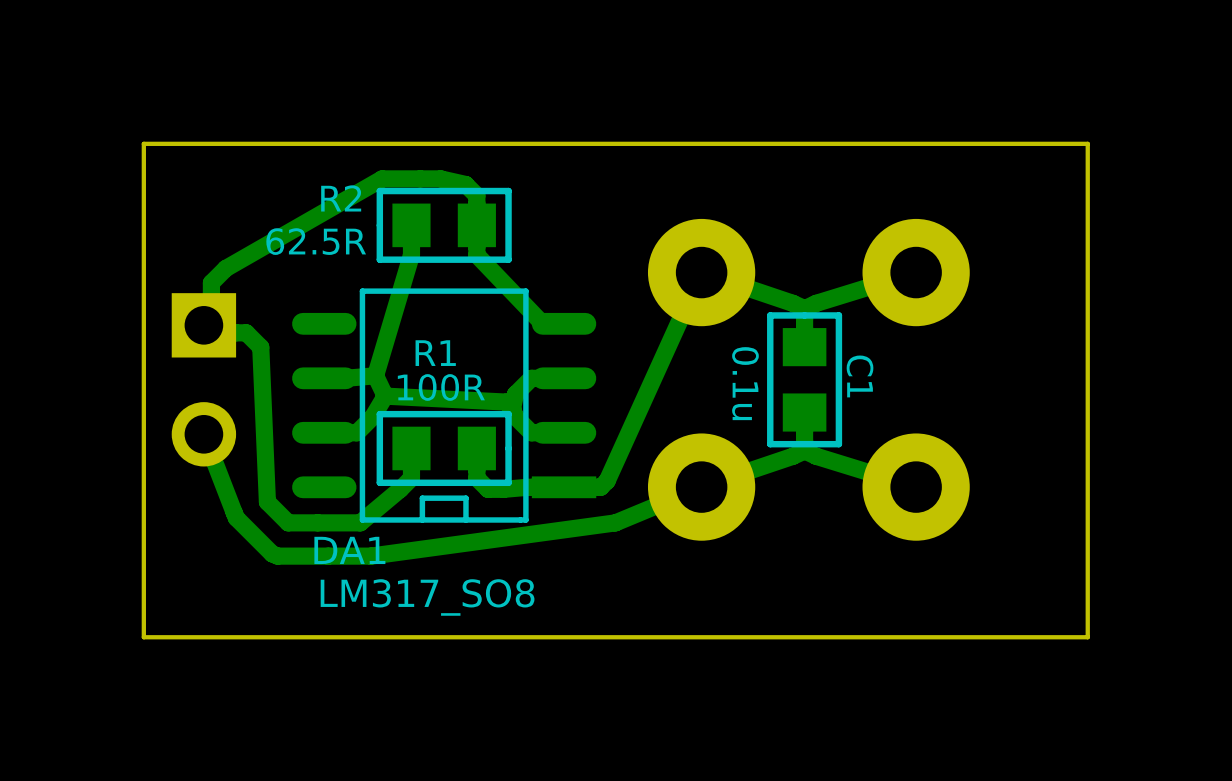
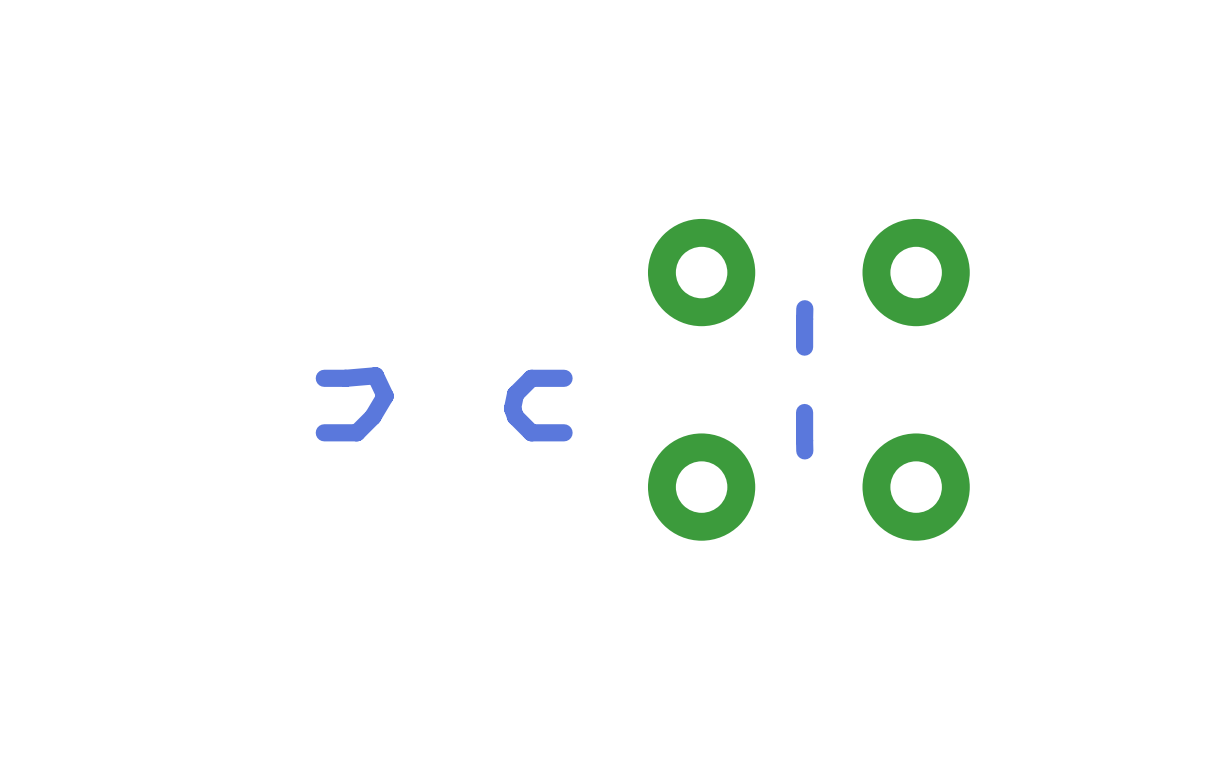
board edge: (1087, 143) (1087, 637) (143, 637) (143, 143) (1087, 143) -> none
track: (411, 225) (411, 255) (375, 375) -> none
R2: 62.5R (444, 225) -> none
track: (916, 272) (816, 303) (804, 308) (701, 272) (607, 480) (600, 487) (488, 489) (476, 478) (476, 448) -> none
track: (564, 323) (542, 323) (476, 255) (476, 195) (465, 184) (440, 178) (382, 178) (225, 268) (211, 282) (211, 301) (203, 325) (227, 332) (246, 332) (260, 347) (267, 502) (288, 522) (360, 522) (411, 478) (411, 448) -> none
part: (203, 379) -> none
C1: 0.1u (804, 379) -> none
track: (385, 396) (506, 402) (512, 408) -> none
DA1: LM317_SO8 (444, 405) -> none
track: (203, 434) (236, 518) (272, 553) (277, 556) (370, 556) (615, 522) (701, 487) (804, 450) (816, 456) (916, 487) -> none
R1: 100R (444, 448) -> none

